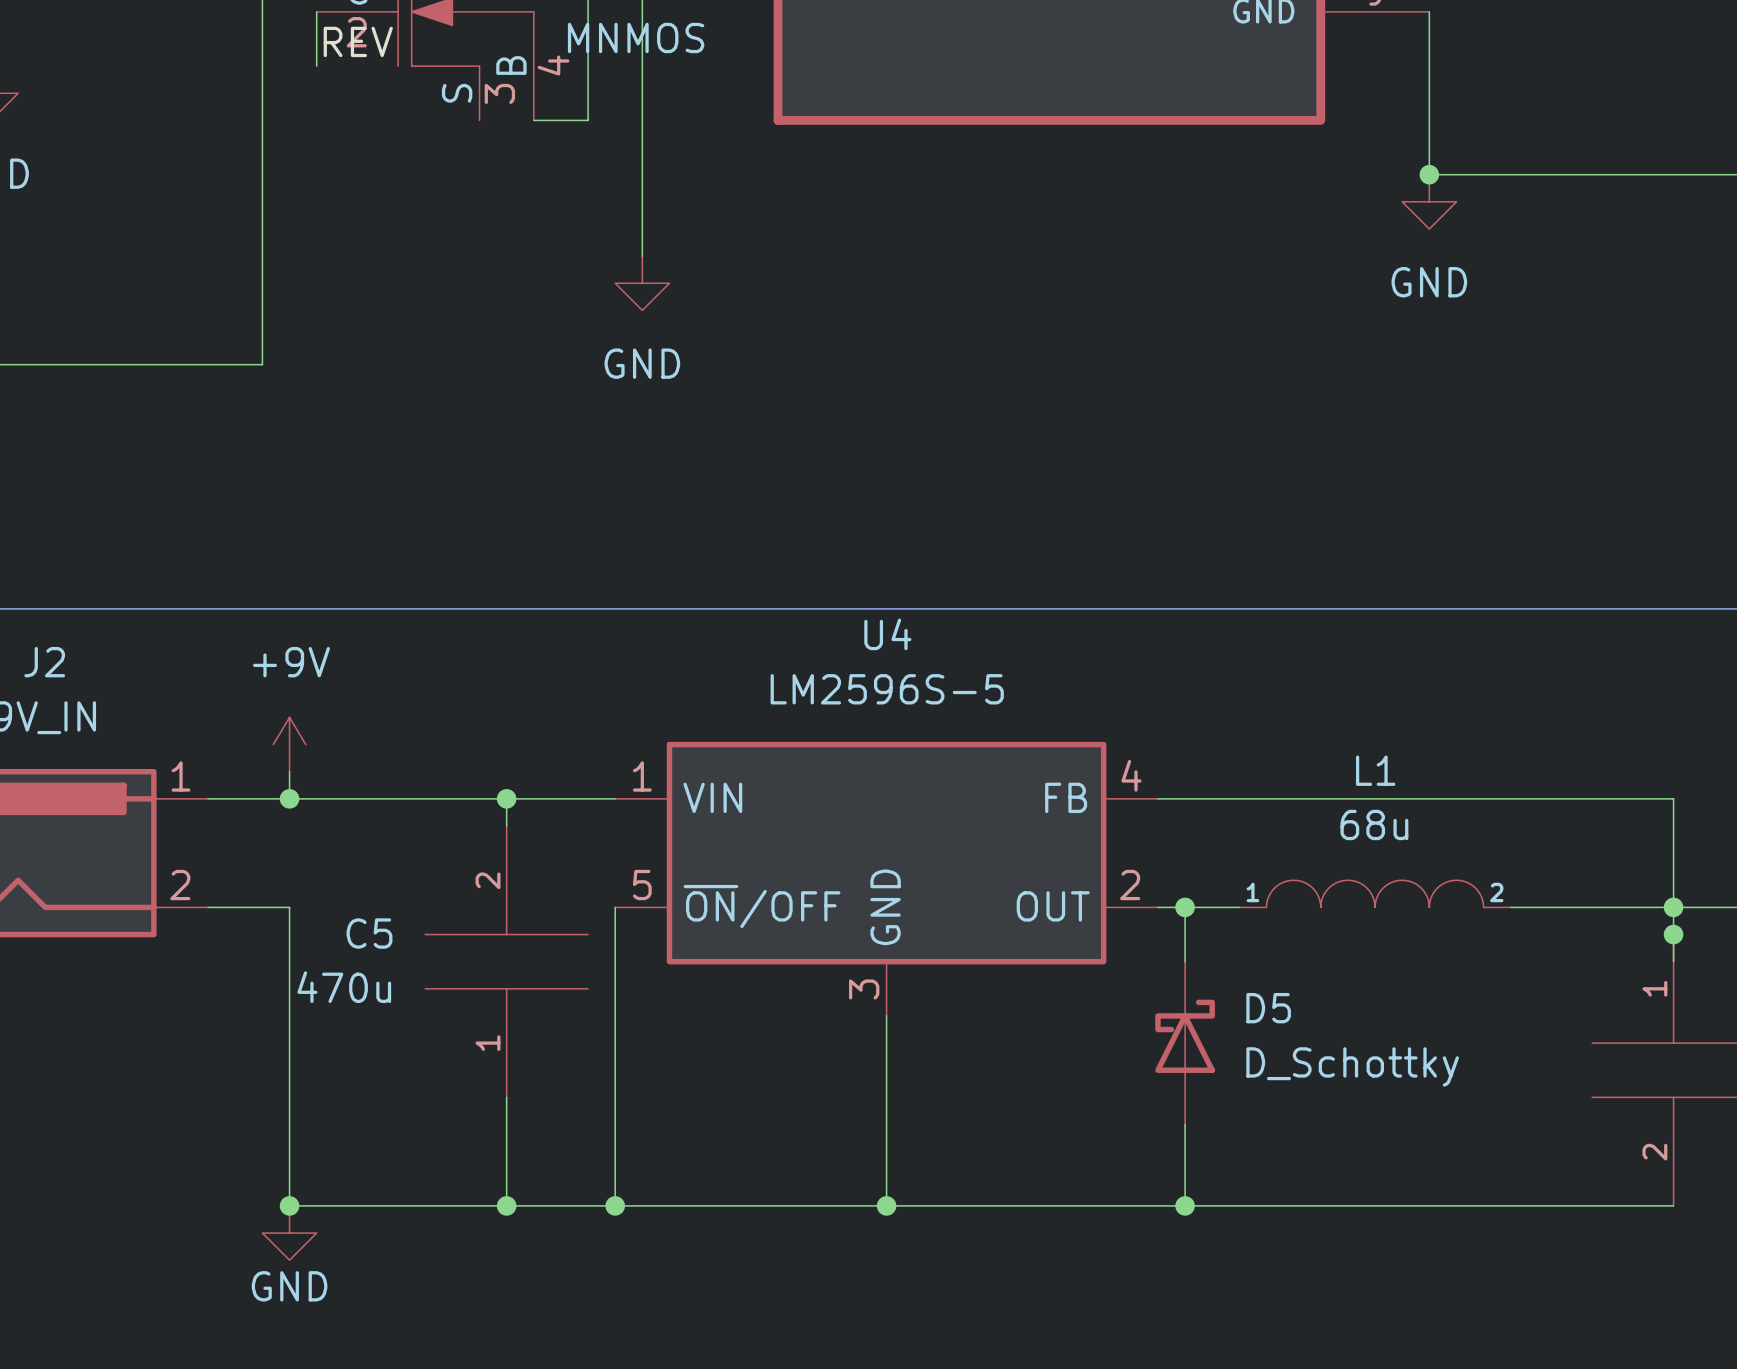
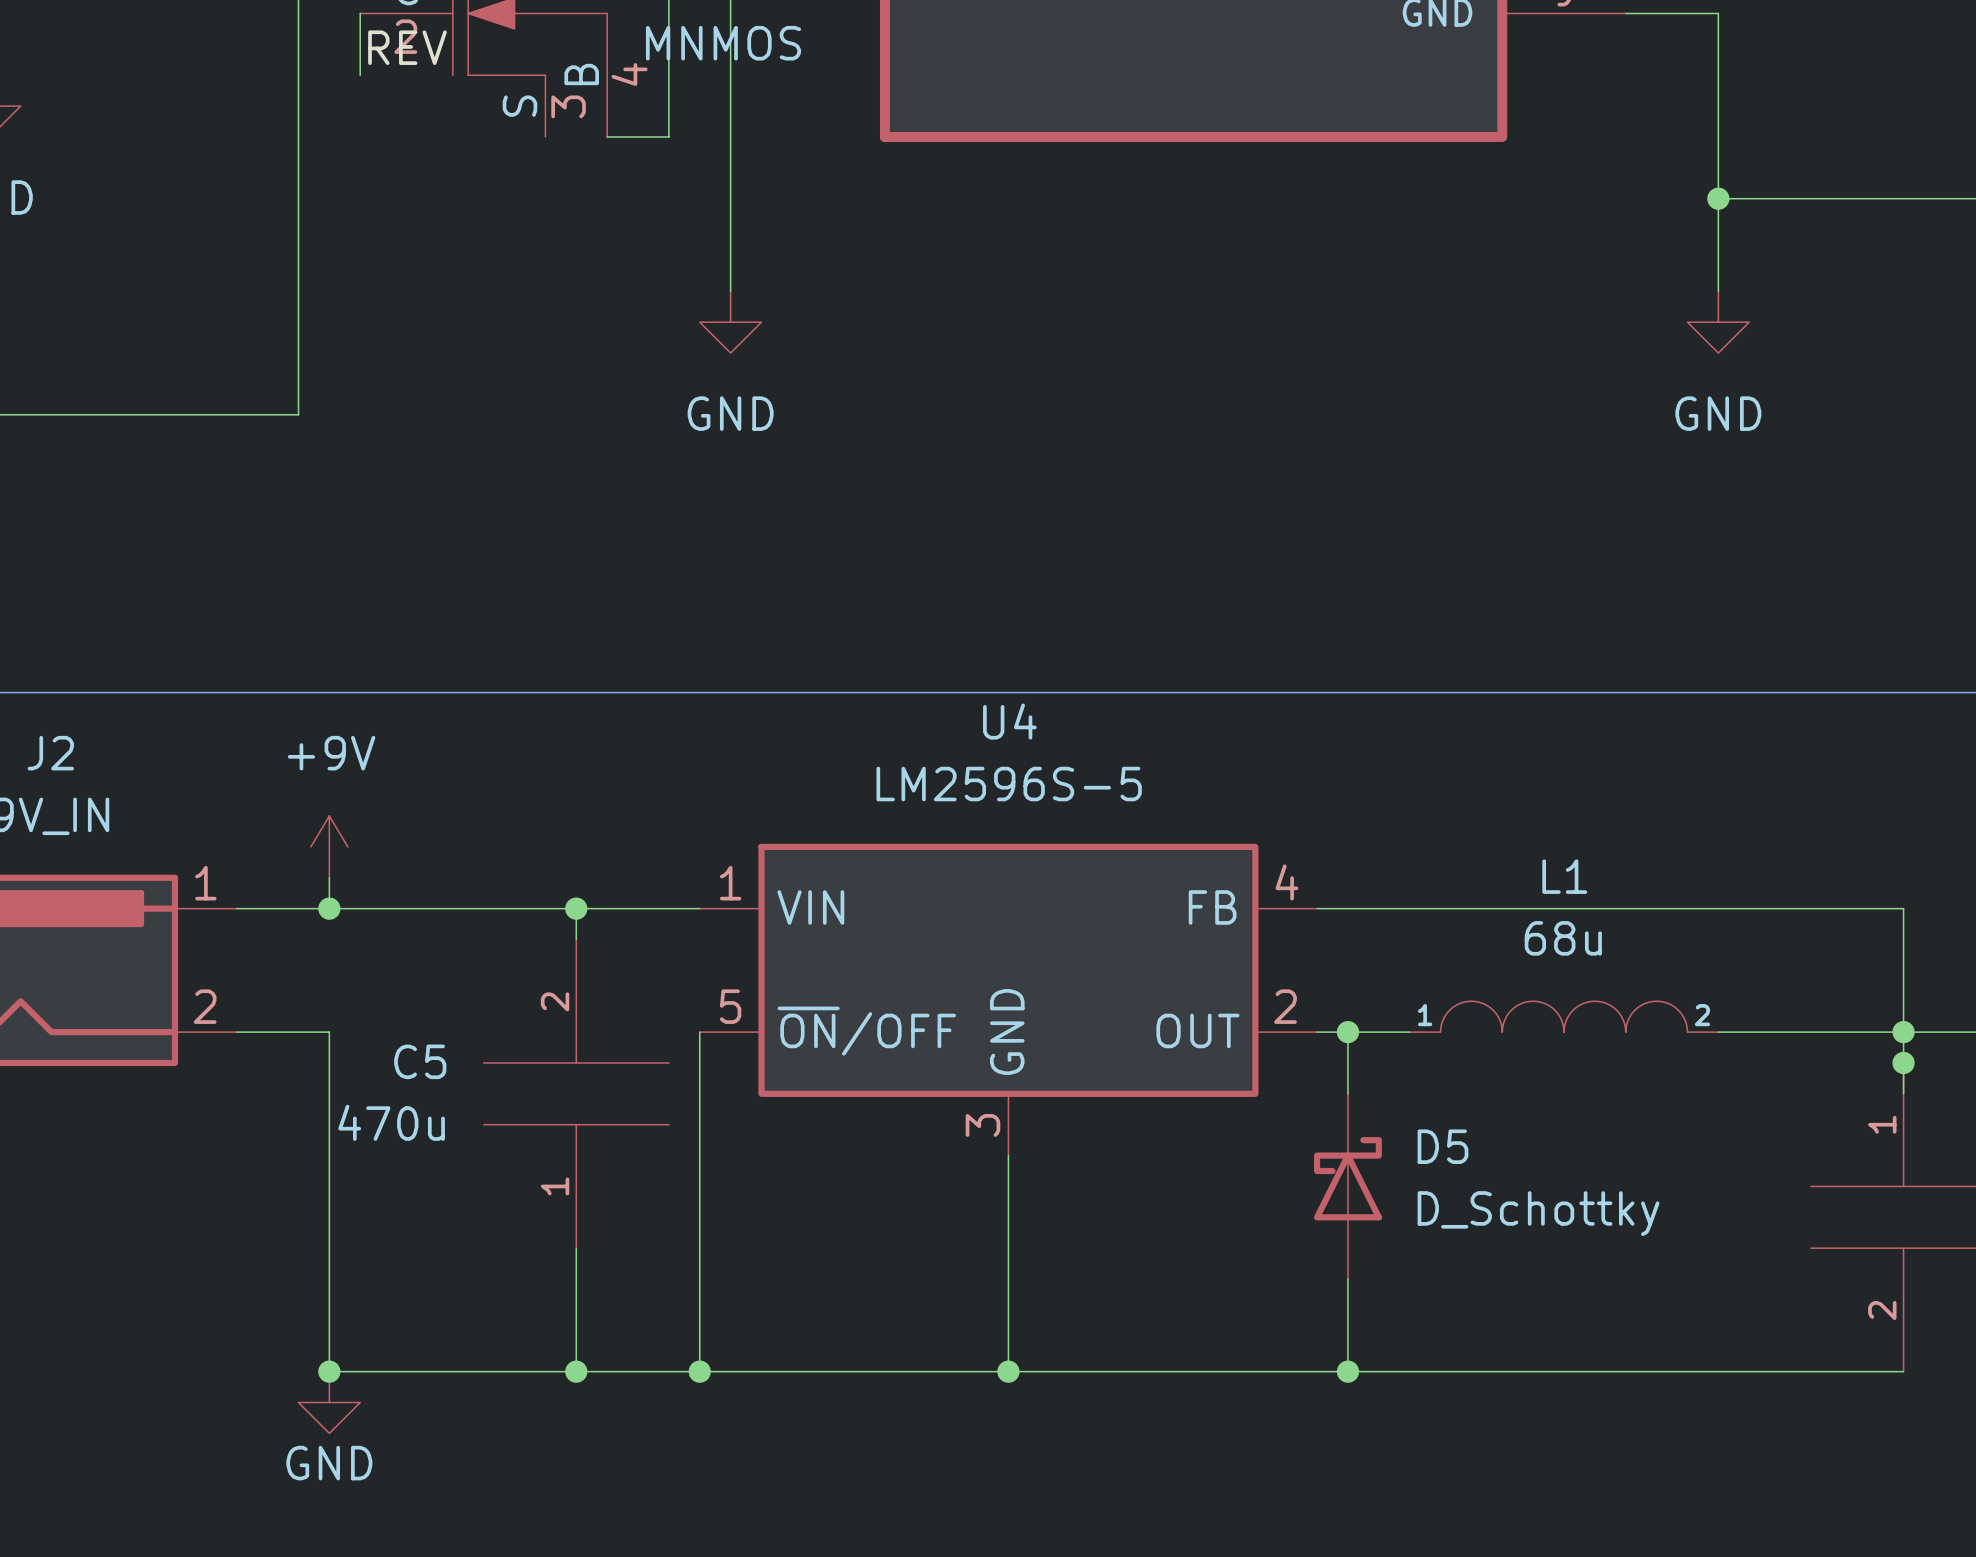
wire: (1429, 11) (1429, 174) (1510, 174) -> (1625, 13) (1718, 13) (1718, 291)
junction position: (1429, 174) -> (1718, 198)
power symbol position: GND (1429, 201) -> GND (1718, 322)

